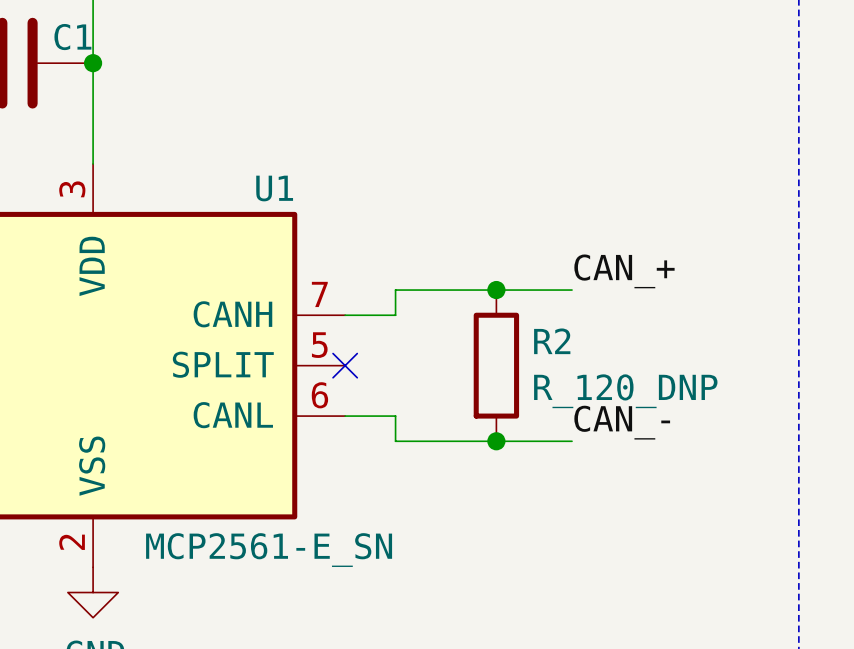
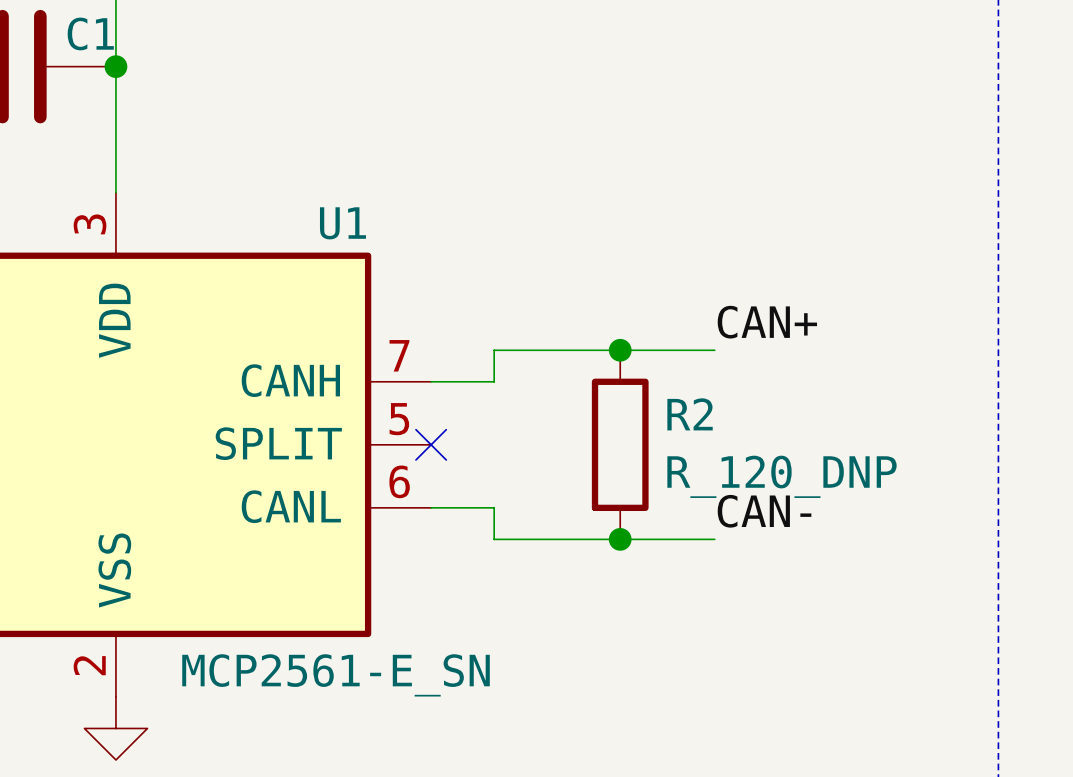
label: CAN_+ (624, 271) -> CAN+ (767, 322)
label: CAN_- (622, 422) -> CAN- (764, 511)

